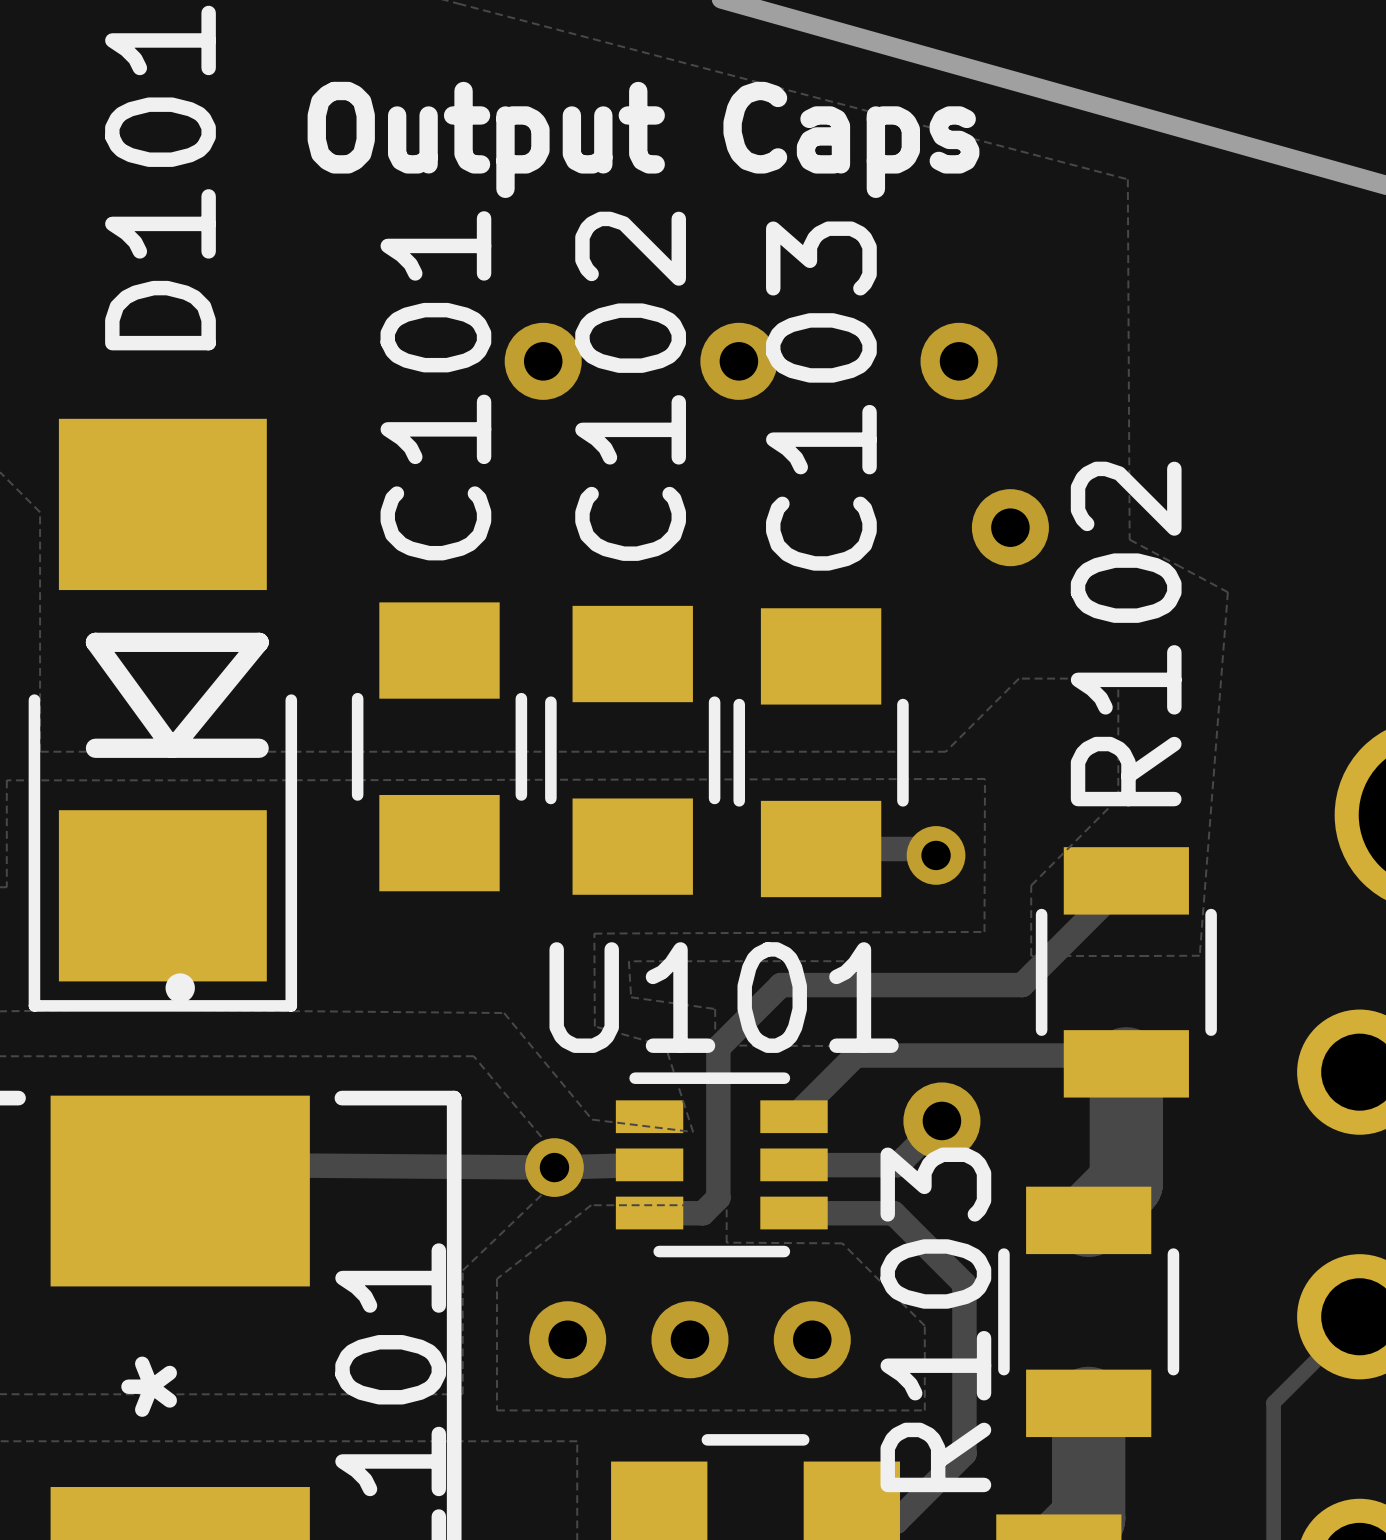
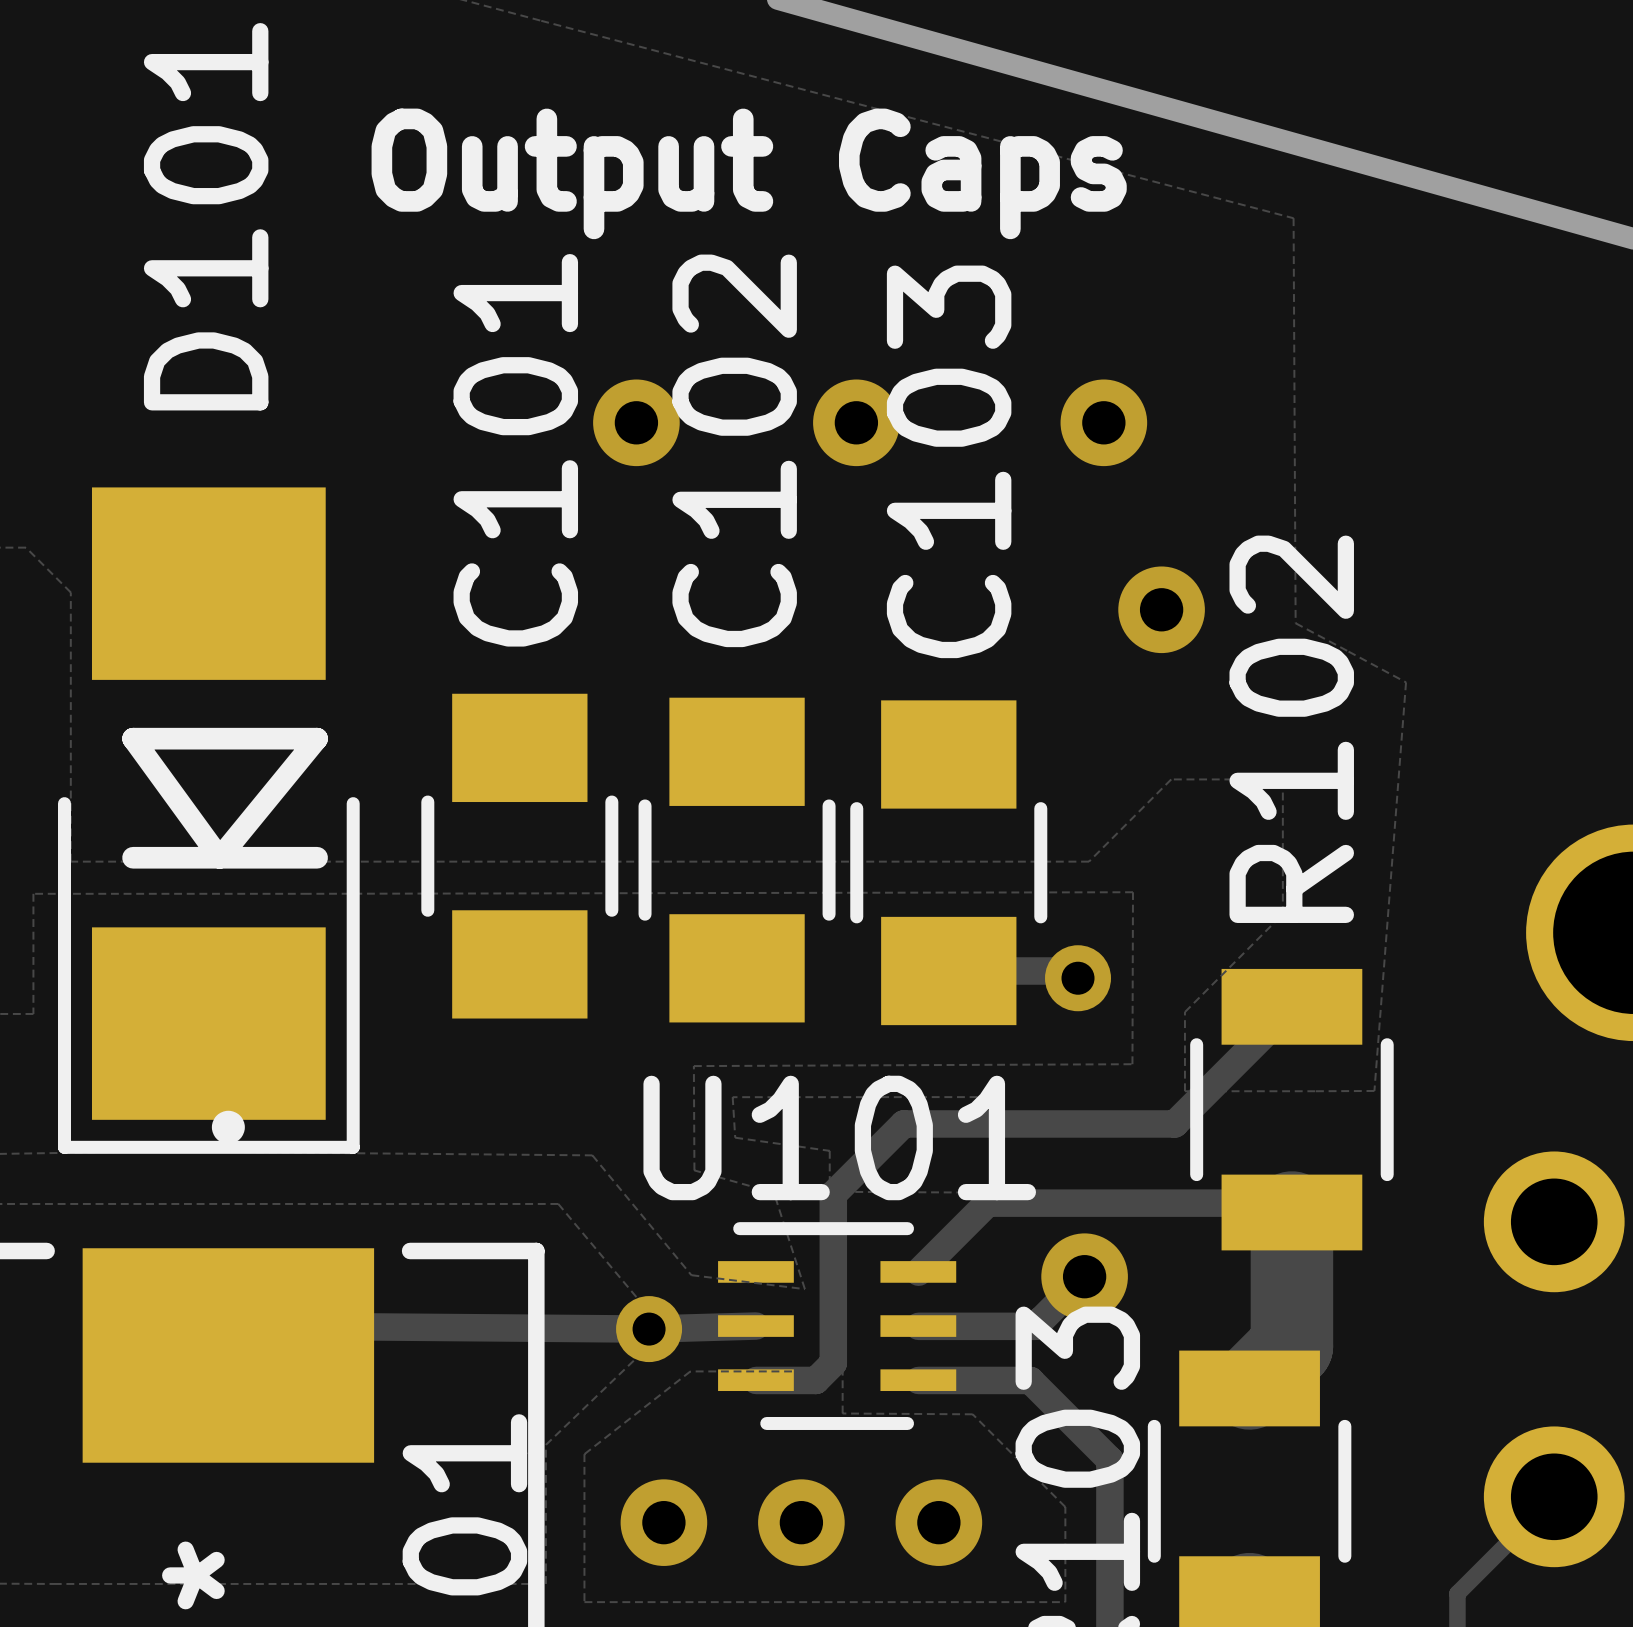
U101 footprint: [615, 1072, 828, 1258] -> [718, 1222, 957, 1430]

